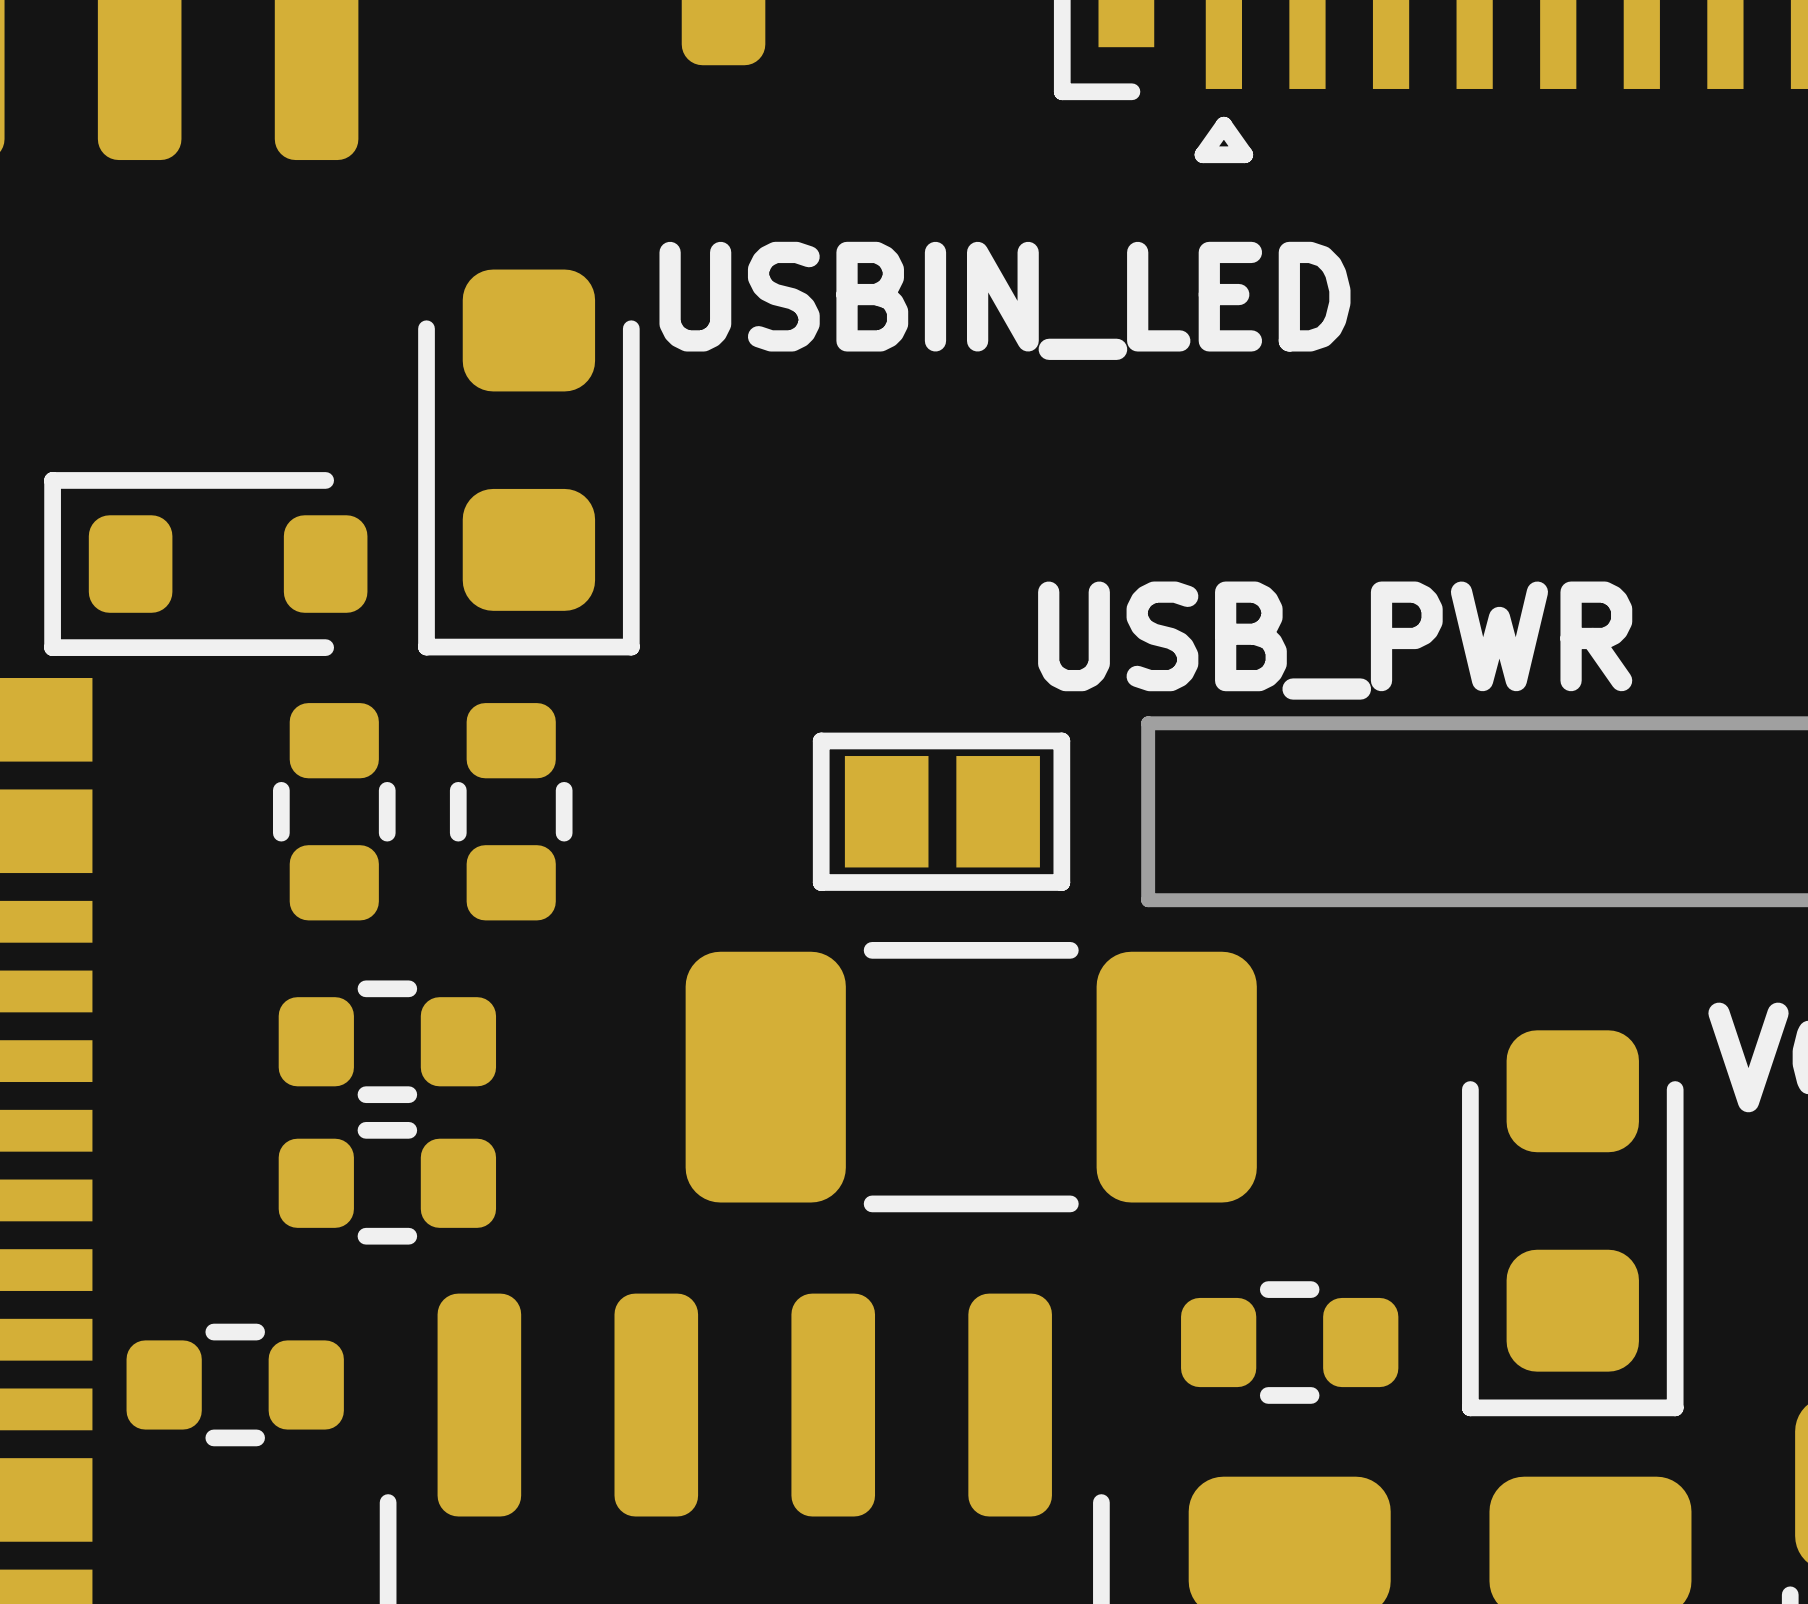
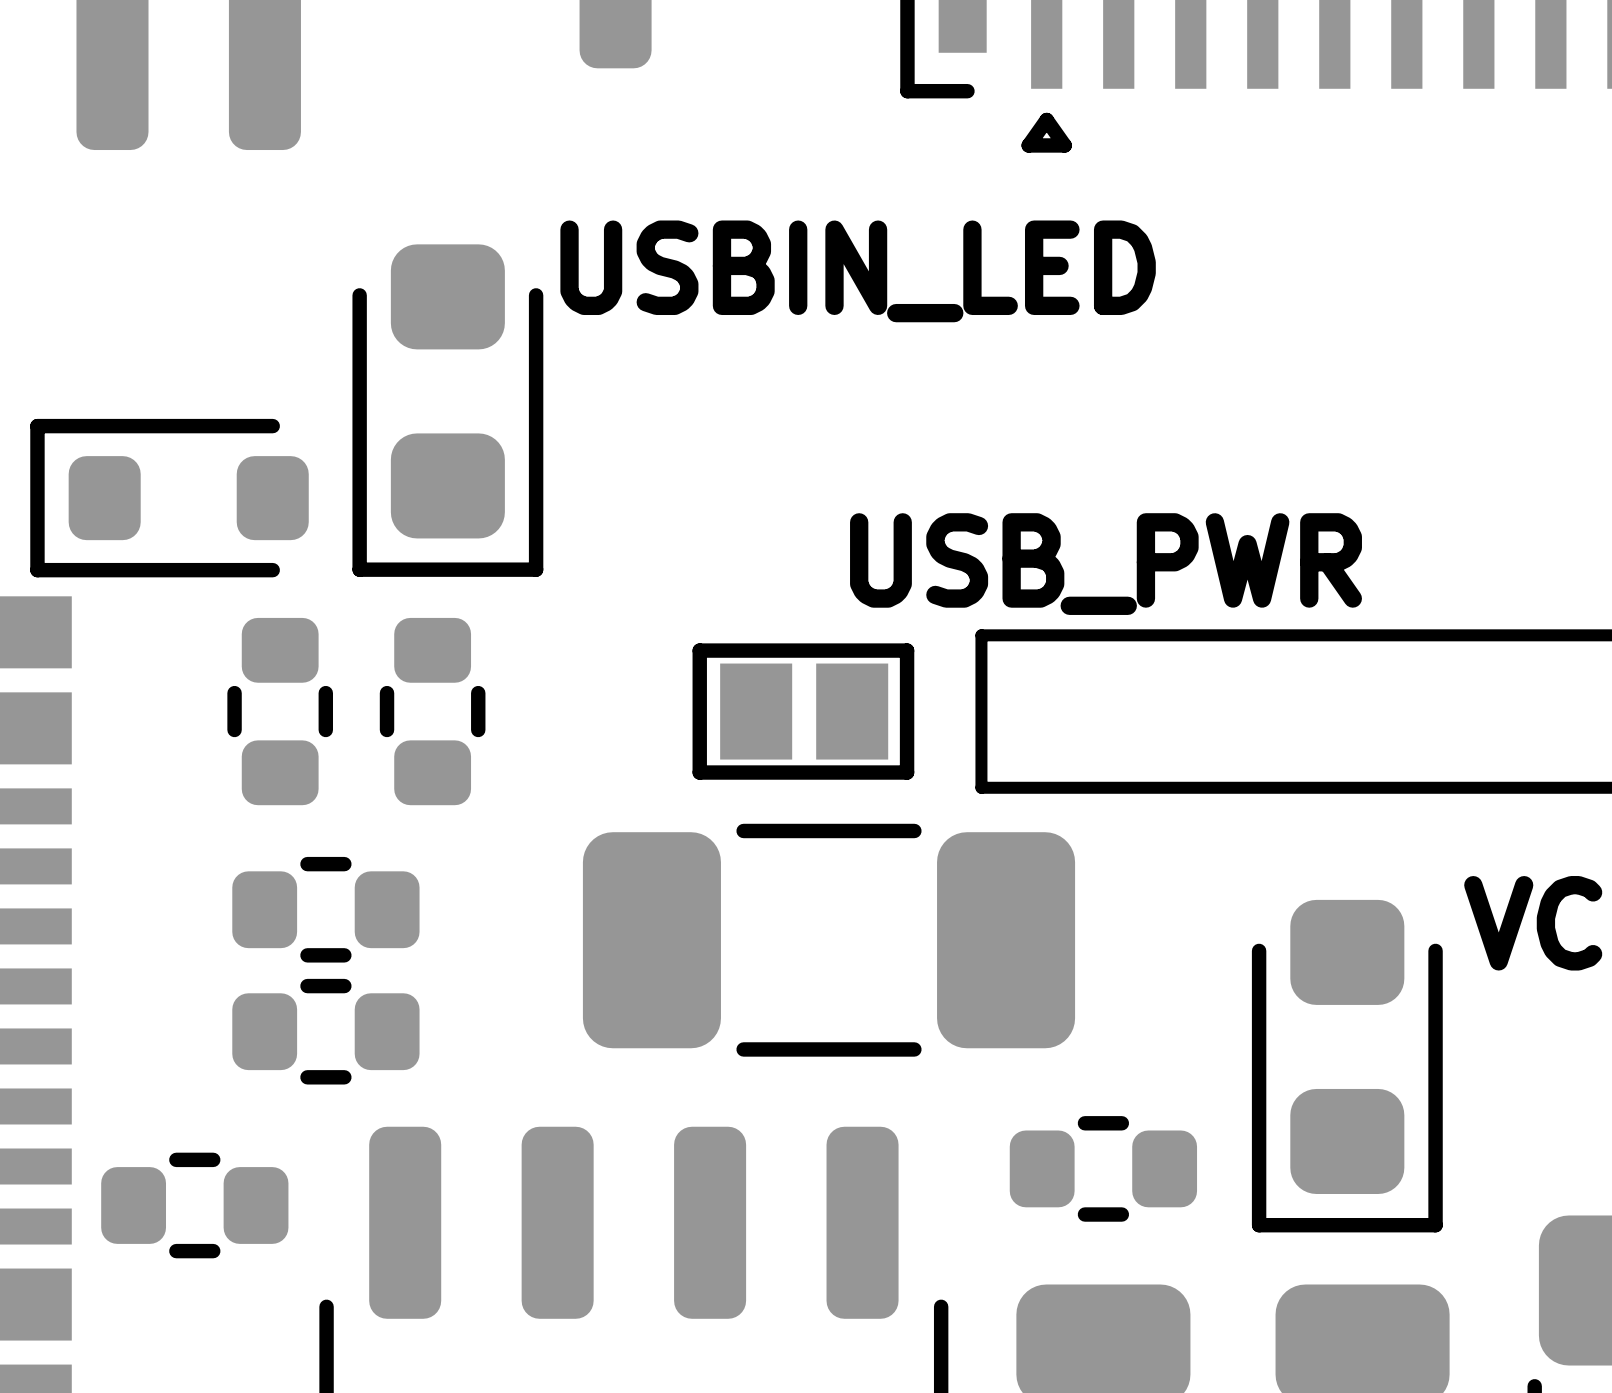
text position: USB_PWR (1335, 640) -> USB_PWR (1106, 564)

